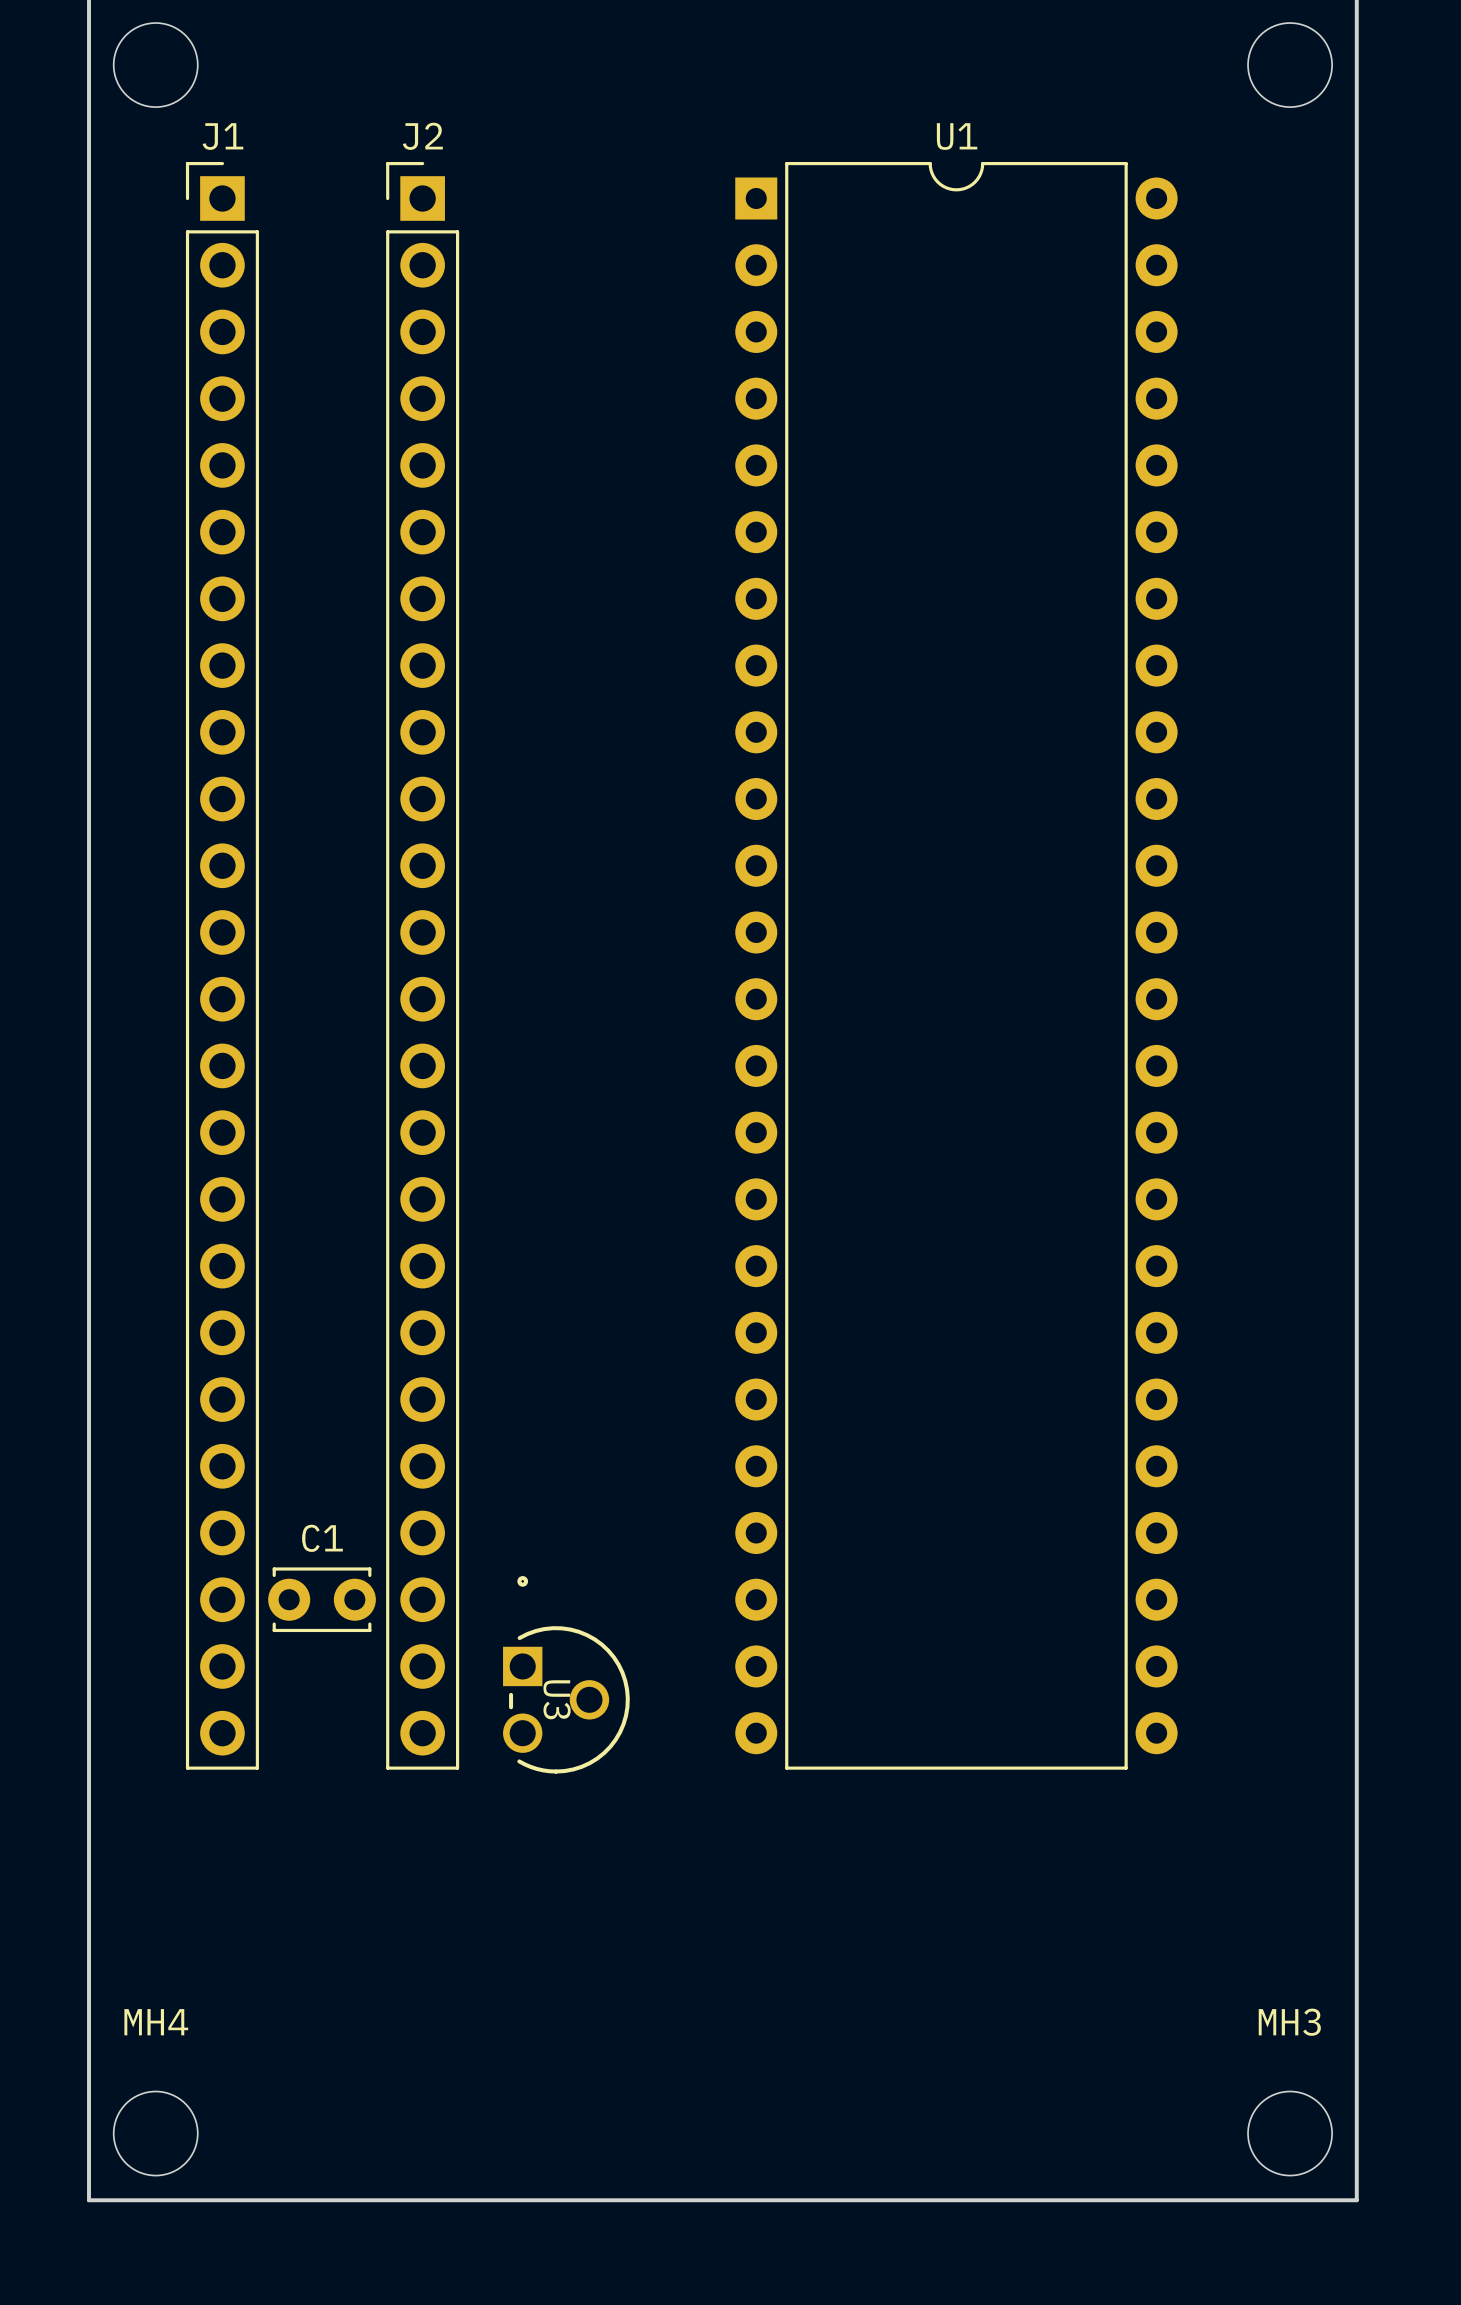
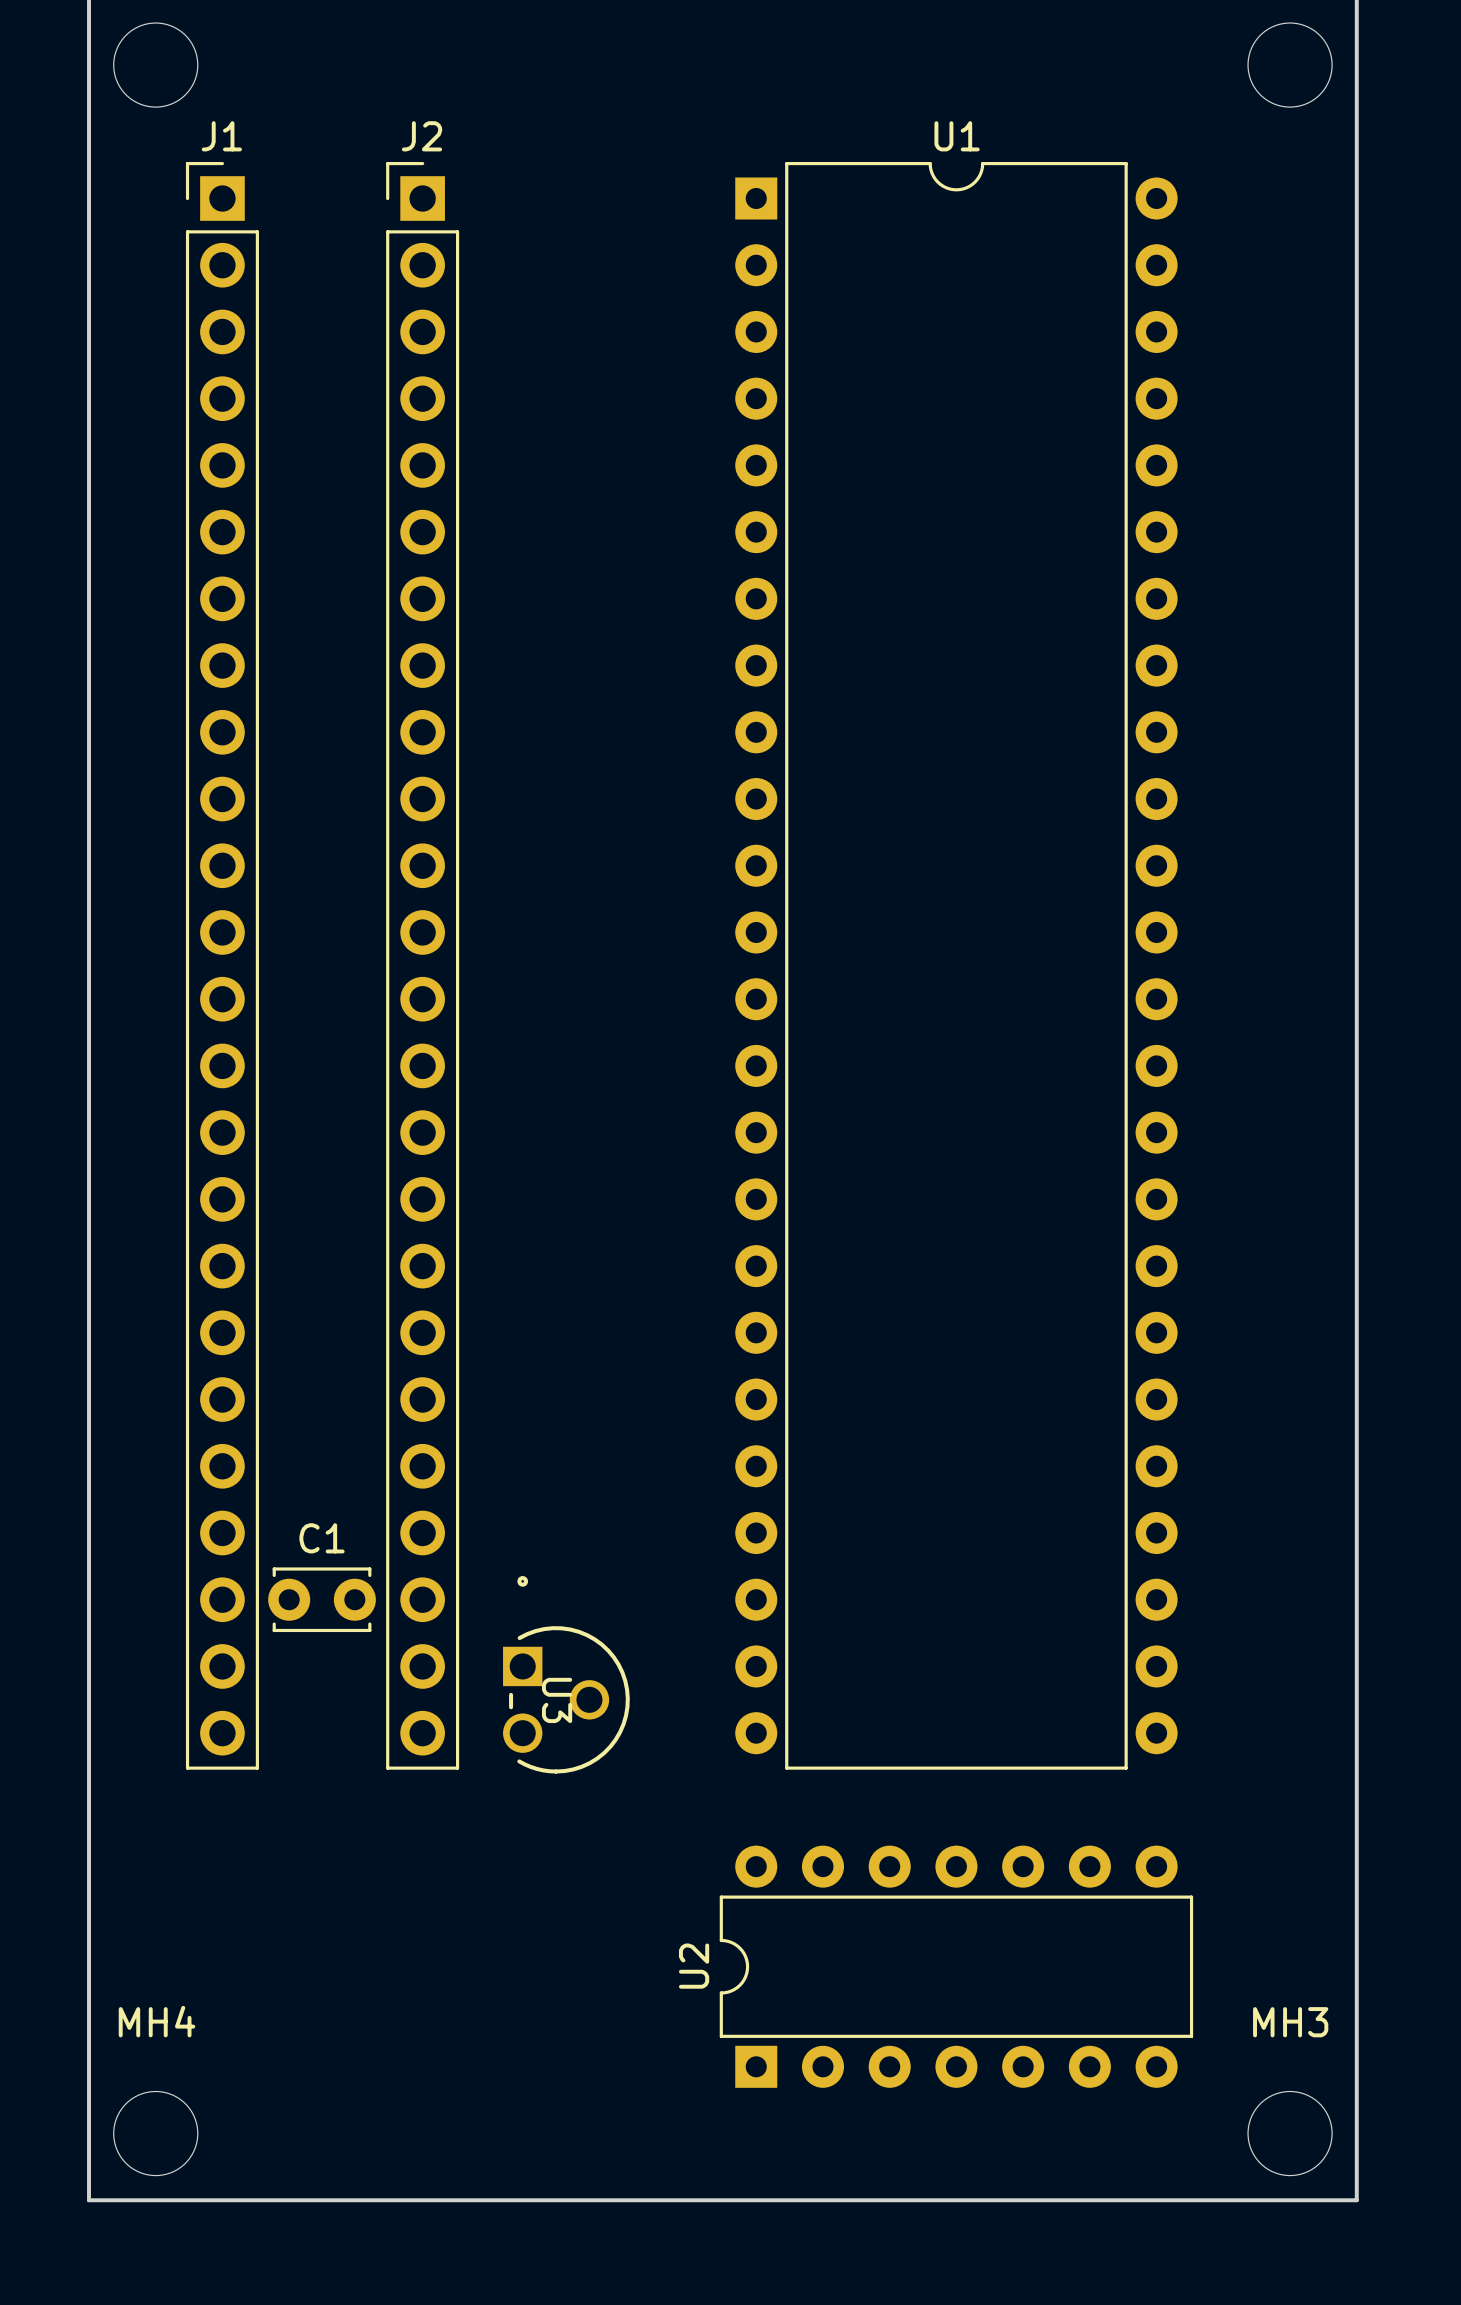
U2: none -> (956, 1966)

